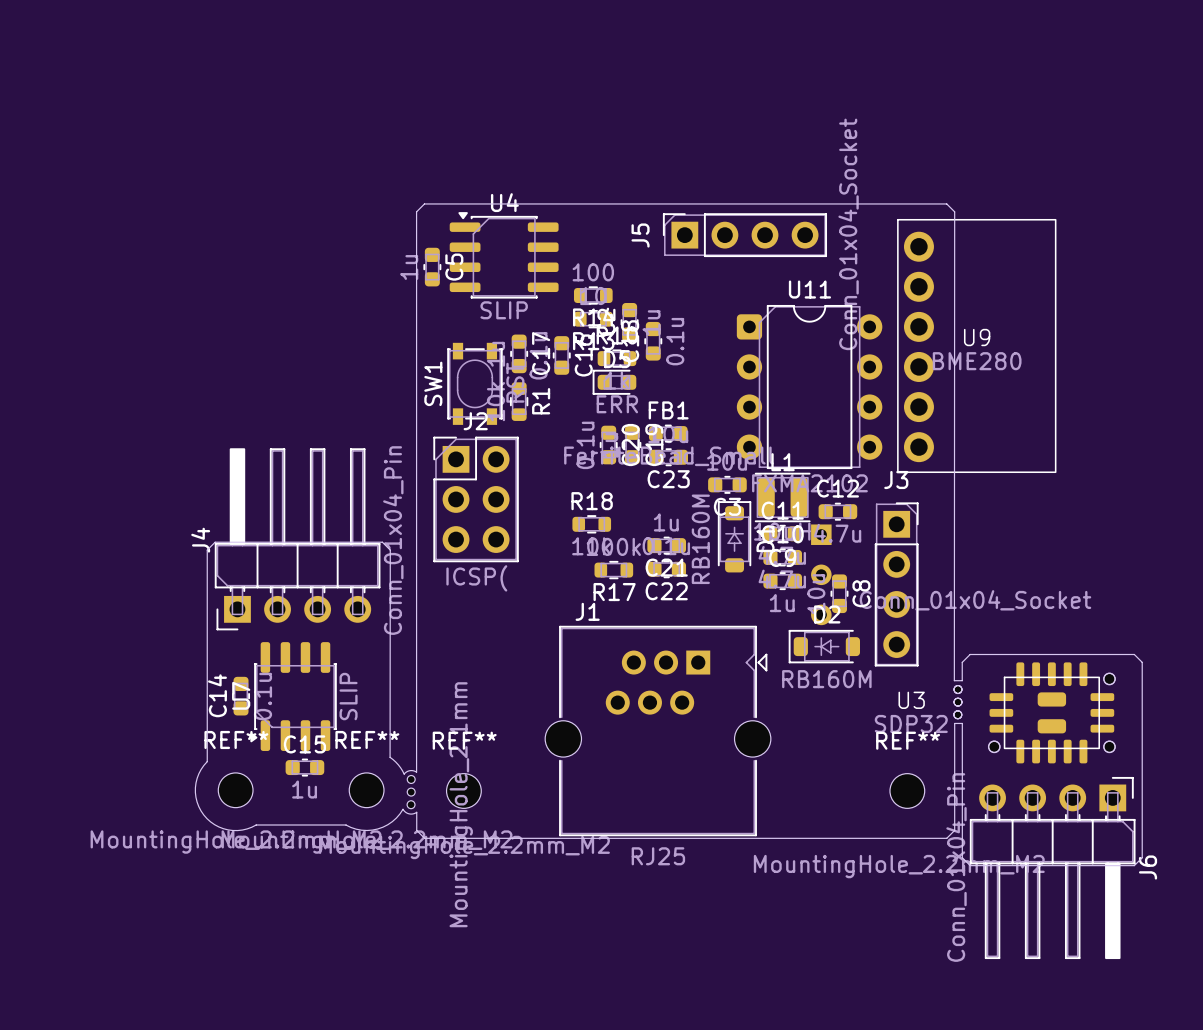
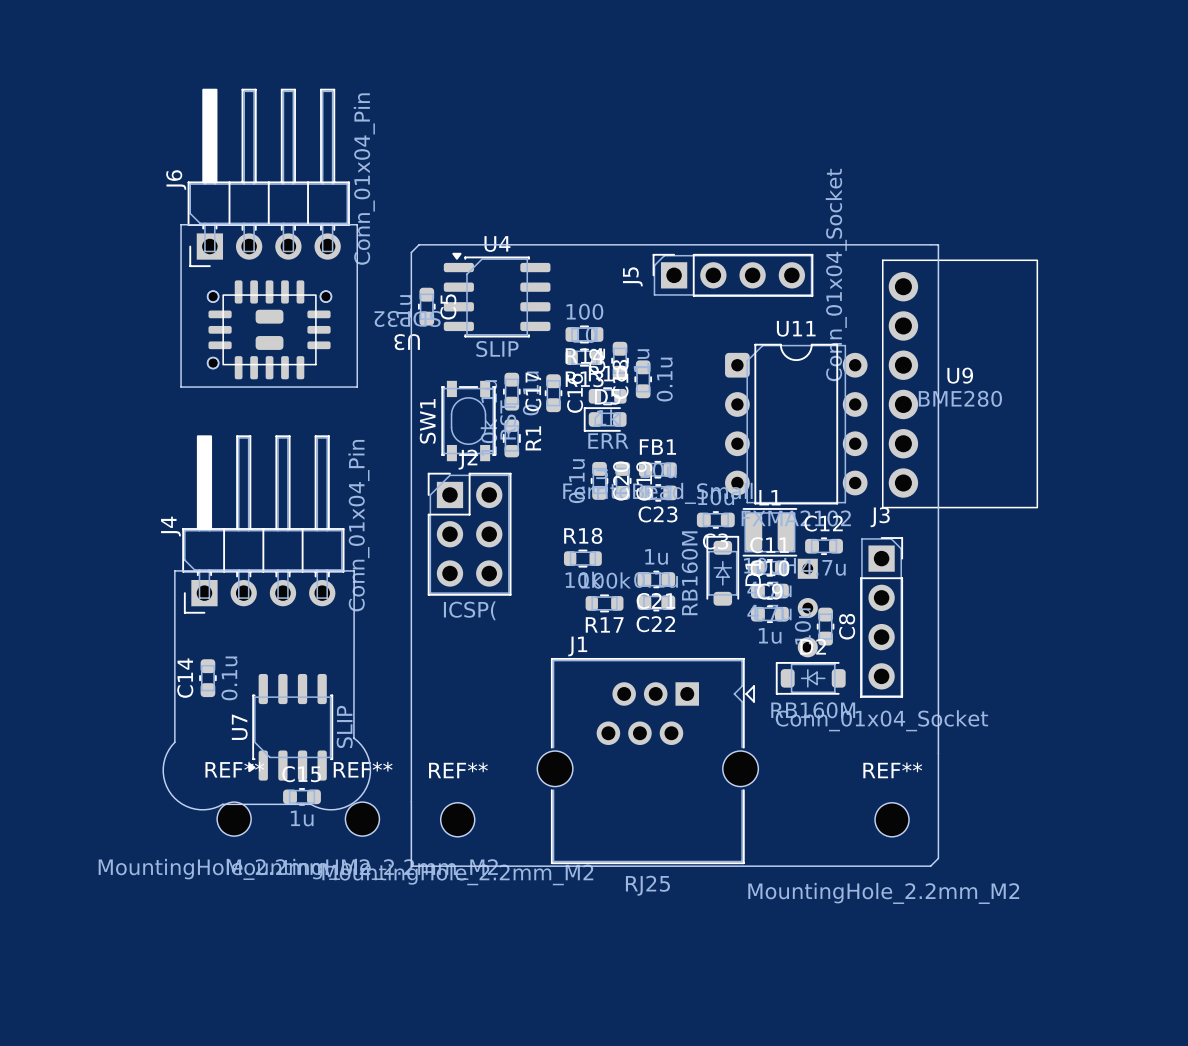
board edge: none -> (181, 224) (357, 224) (357, 387) (181, 387) (181, 224)
board edge: (946, 203) (954, 211) (954, 680) (962, 680) (962, 662) (970, 654) (1134, 654) (1142, 662) (1142, 857) (1134, 865) (970, 865) (962, 857) (962, 723) (954, 723) -> (930, 244) (938, 244) (938, 753)
J4 position: (297, 539) -> (263, 524)
J3 value position: Conn_01x04_Socket (975, 600) -> Conn_01x04_Socket (881, 720)
part: (957, 689) -> none
C14 position: (241, 696) -> (207, 678)
part: (957, 702) -> none
board edge: none -> (174, 742) (164, 758) (163, 777) (171, 794) (178, 801) (190, 807) (204, 809) (222, 804) (310, 804) (320, 808) (335, 809) (349, 805) (357, 799) (368, 782) (370, 767) (364, 749) (353, 738) (354, 570) (174, 570) (174, 742)
U3 rotation: 0° (1051, 712) -> 180° (269, 329)
U3 position: (1051, 712) -> (269, 329)
part: (957, 714) -> none
board edge: (390, 757) (404, 774) (410, 770) (416, 772) -> (419, 866) (411, 866) (411, 801)
board edge: (390, 757) (390, 550) (382, 542) (215, 542) (207, 550) (207, 761) -> none
board edge: (207, 761) (197, 778) (195, 797) (203, 814) (218, 826) (237, 830) (256, 825) (346, 825) -> none
part: (411, 779) -> none
part: (411, 792) -> none
part: MountingHole_2.1mm (411, 804) -> none
board edge: (346, 825) (361, 830) (377, 828) (392, 821) (403, 809) (409, 813) (416, 812) (416, 830) (424, 838) -> none
J6 rotation: 0° (1052, 868) -> 180° (268, 177)
J6 position: (1052, 868) -> (268, 177)

